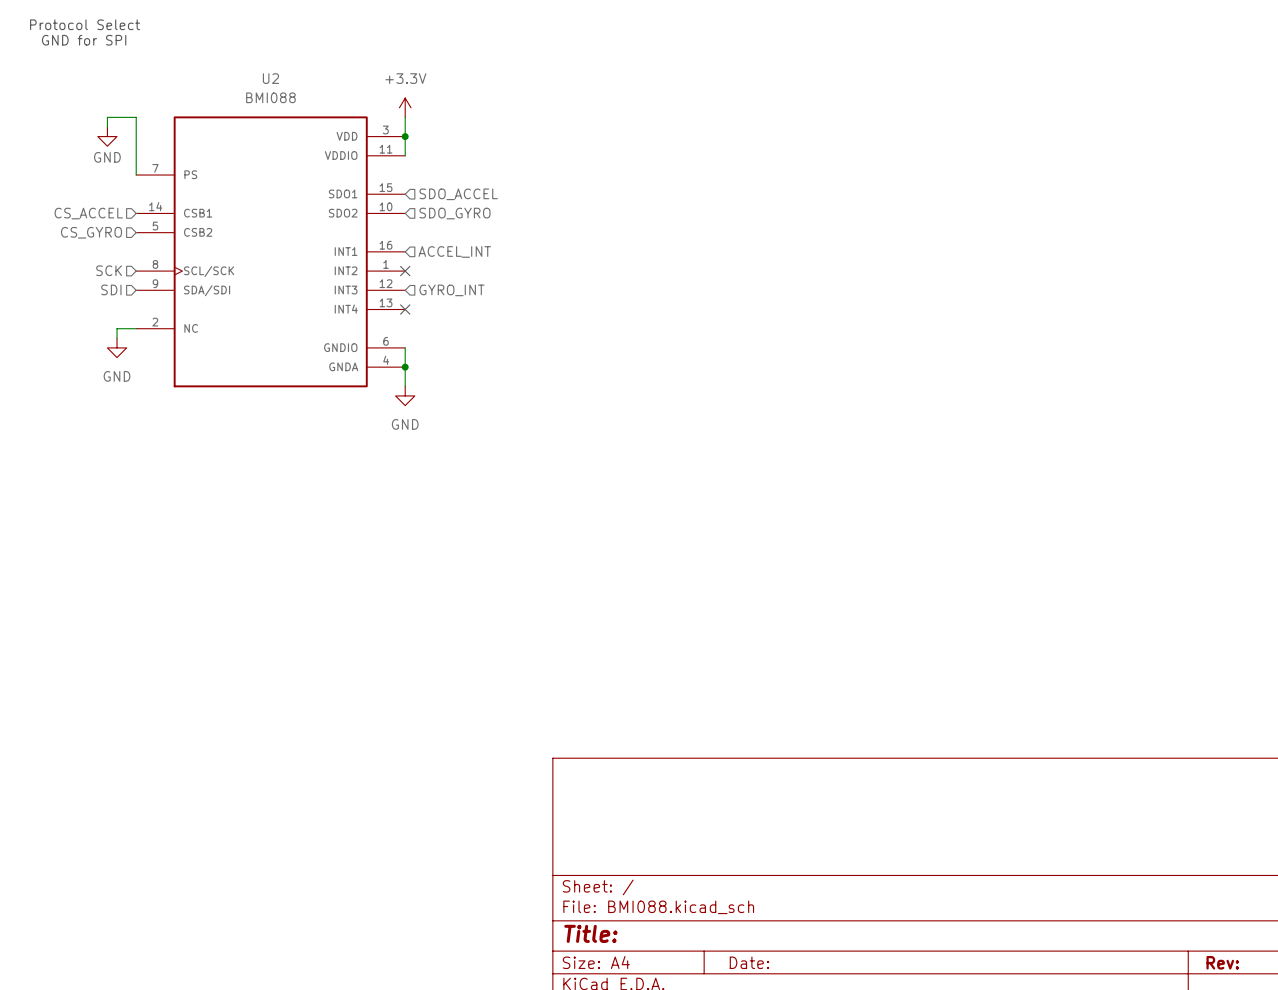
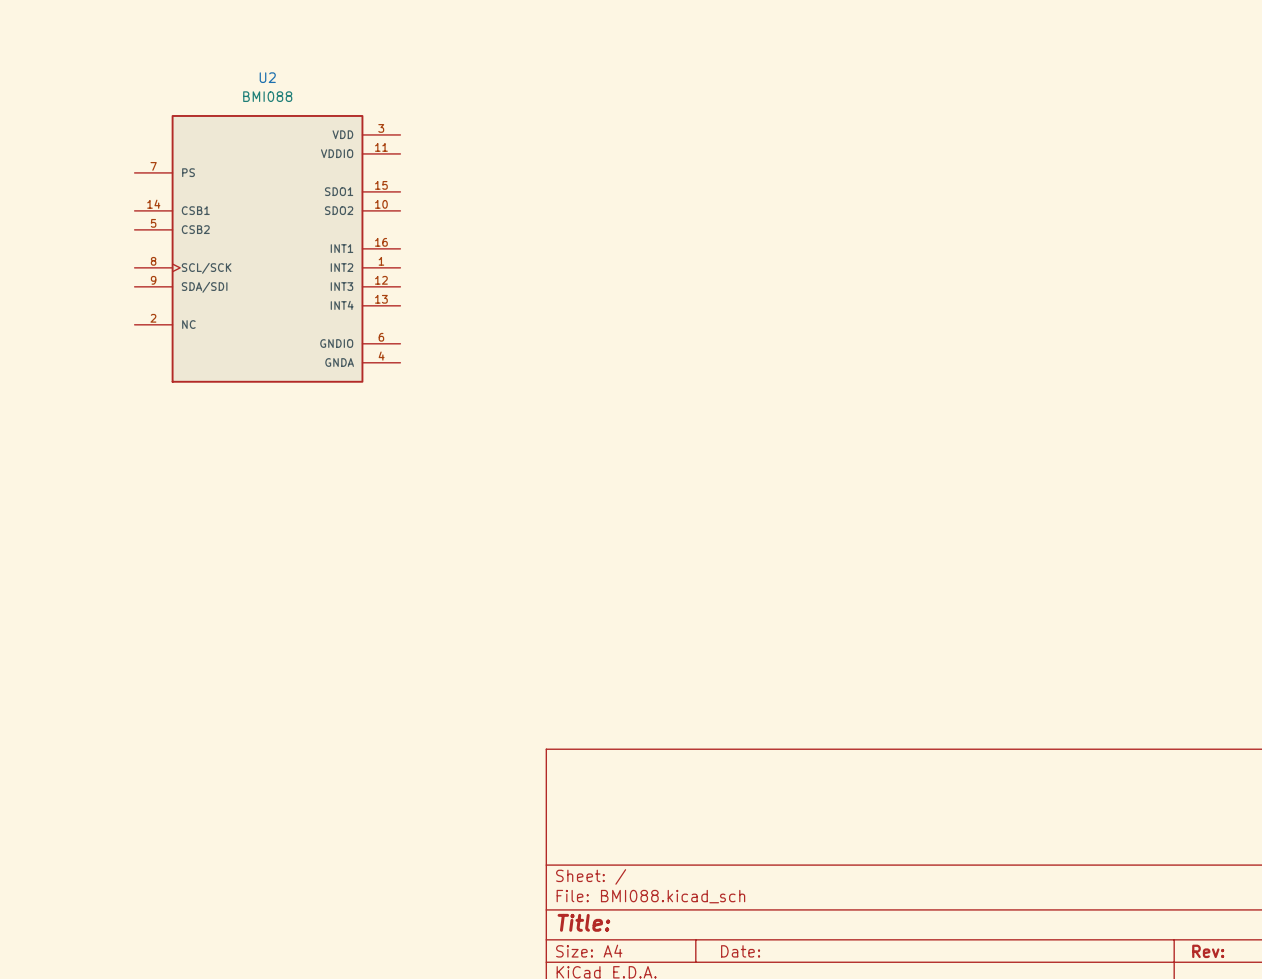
text: Protocol Select (85, 24) -> none
text: GND for SPI (84, 40) -> none
power symbol: +3.3V (405, 107) -> none
wire: (405, 117) (405, 155) -> none
wire: (107, 126) (107, 117) (136, 117) (136, 175) -> none
power symbol: GND (107, 136) -> none
junction: (405, 136) -> none
hierarchical label: SDO_ACCEL (458, 194) -> none
hierarchical label: CS_ACCEL (88, 213) -> none
hierarchical label: SDO_GYRO (455, 213) -> none
hierarchical label: CS_GYRO (91, 232) -> none
hierarchical label: ACCEL_INT (454, 251) -> none
hierarchical label: SCK (109, 270) -> none
no-connect mark: (405, 271) -> none
hierarchical label: SDI (111, 289) -> none
hierarchical label: GYRO_INT (452, 290) -> none
no-connect mark: (405, 309) -> none
wire: (136, 328) (117, 328) (117, 338) -> none
power symbol: GND (117, 347) -> none
wire: (405, 347) (405, 386) -> none
junction: (405, 367) -> none
power symbol: GND (405, 395) -> none

